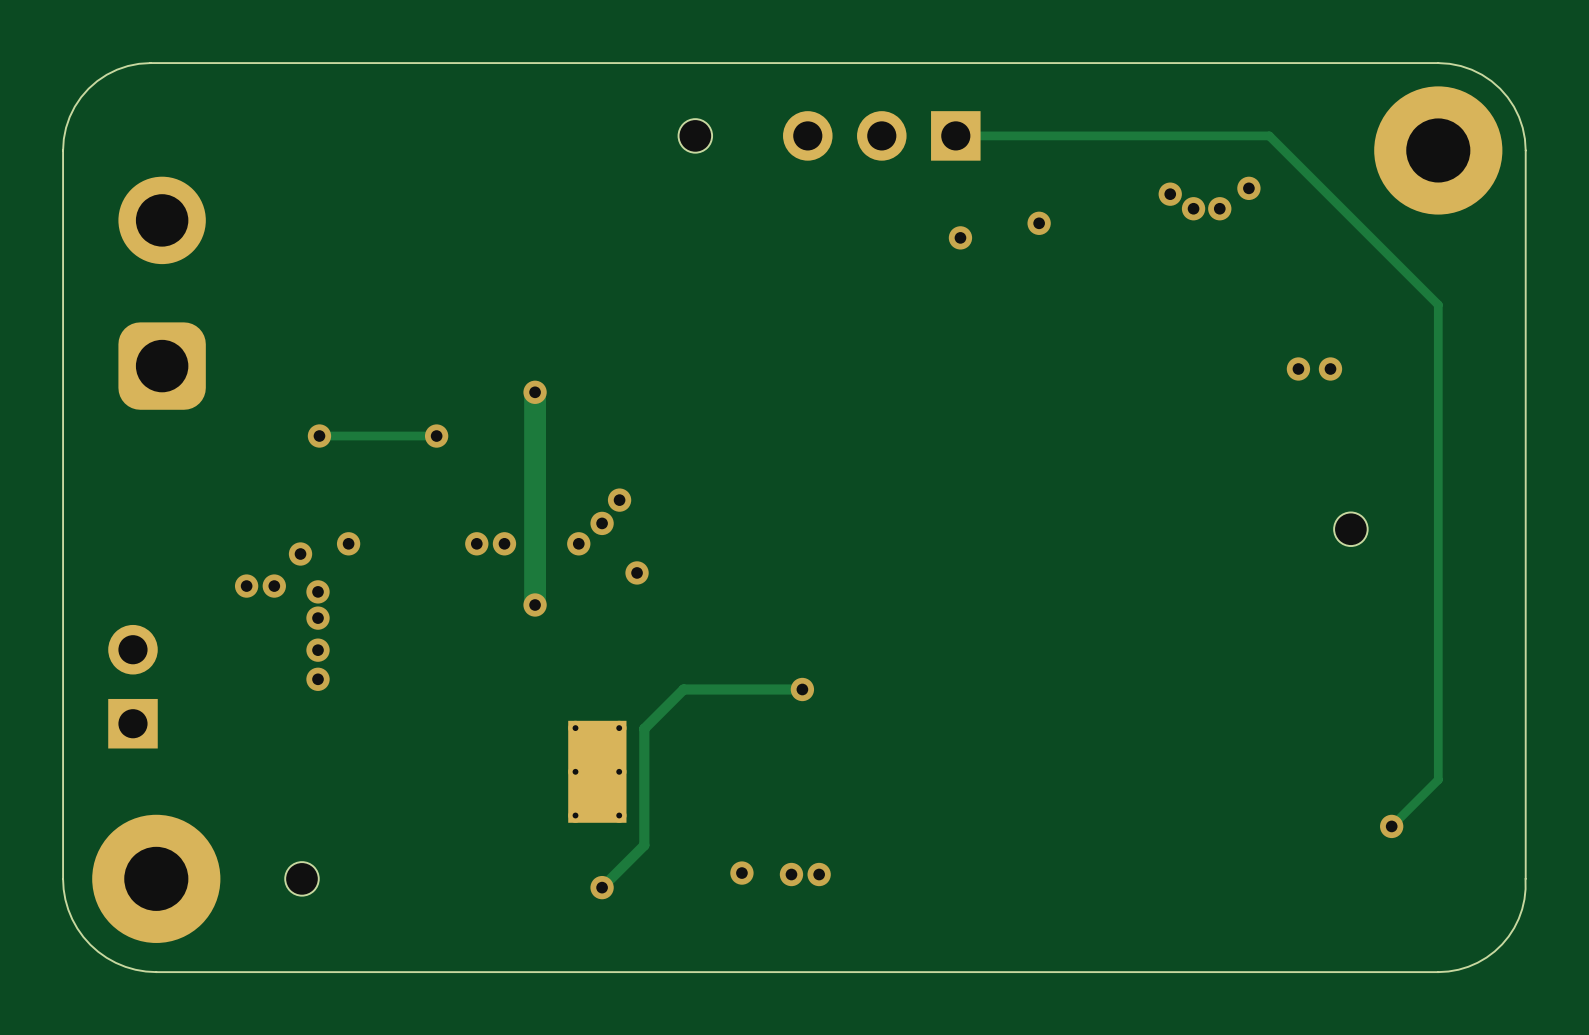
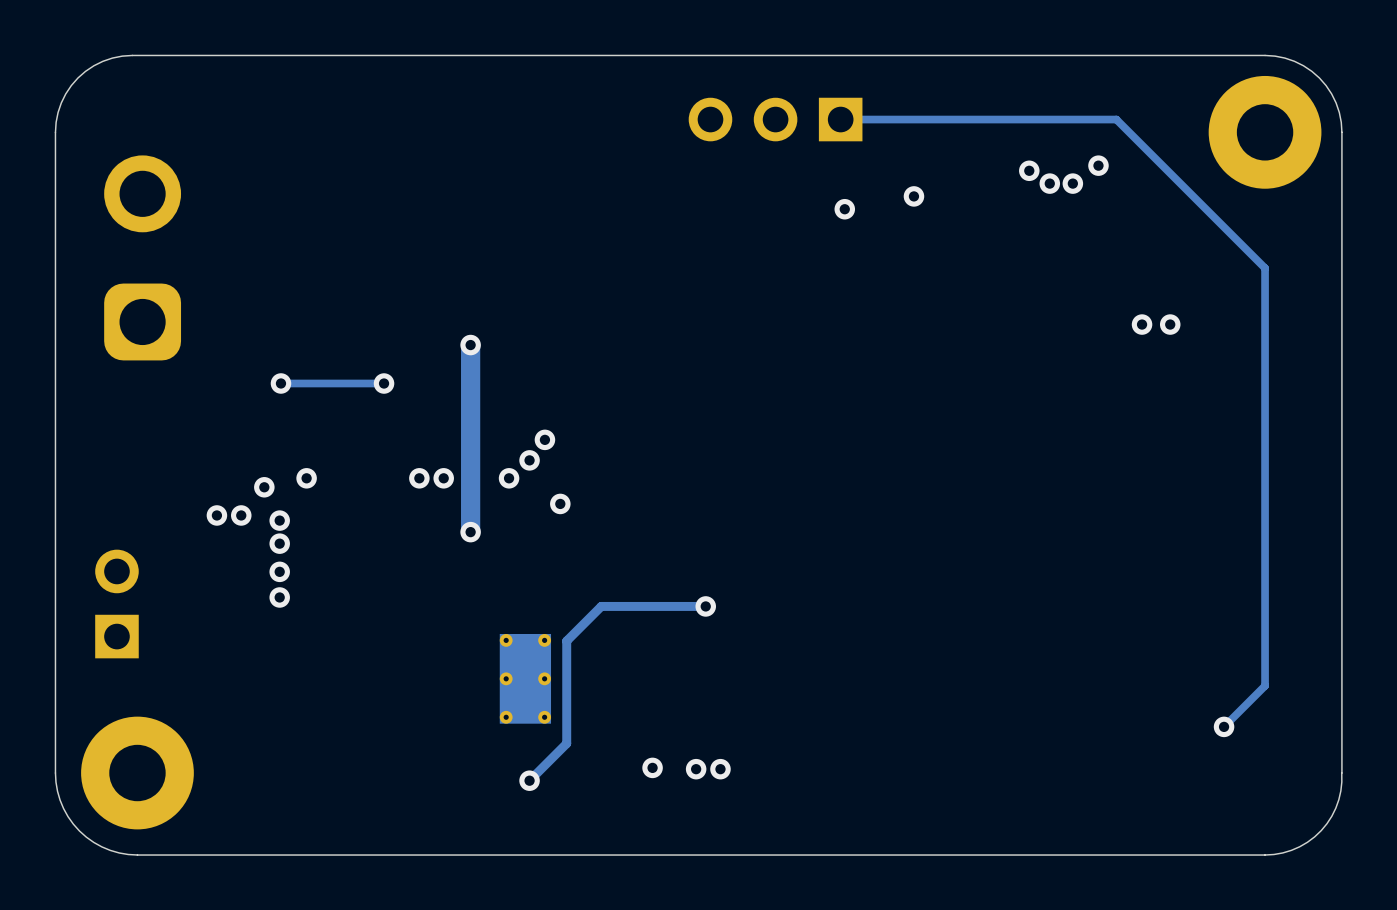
part: (695, 135) -> none
part: (1350, 529) -> none
part: (301, 878) -> none

